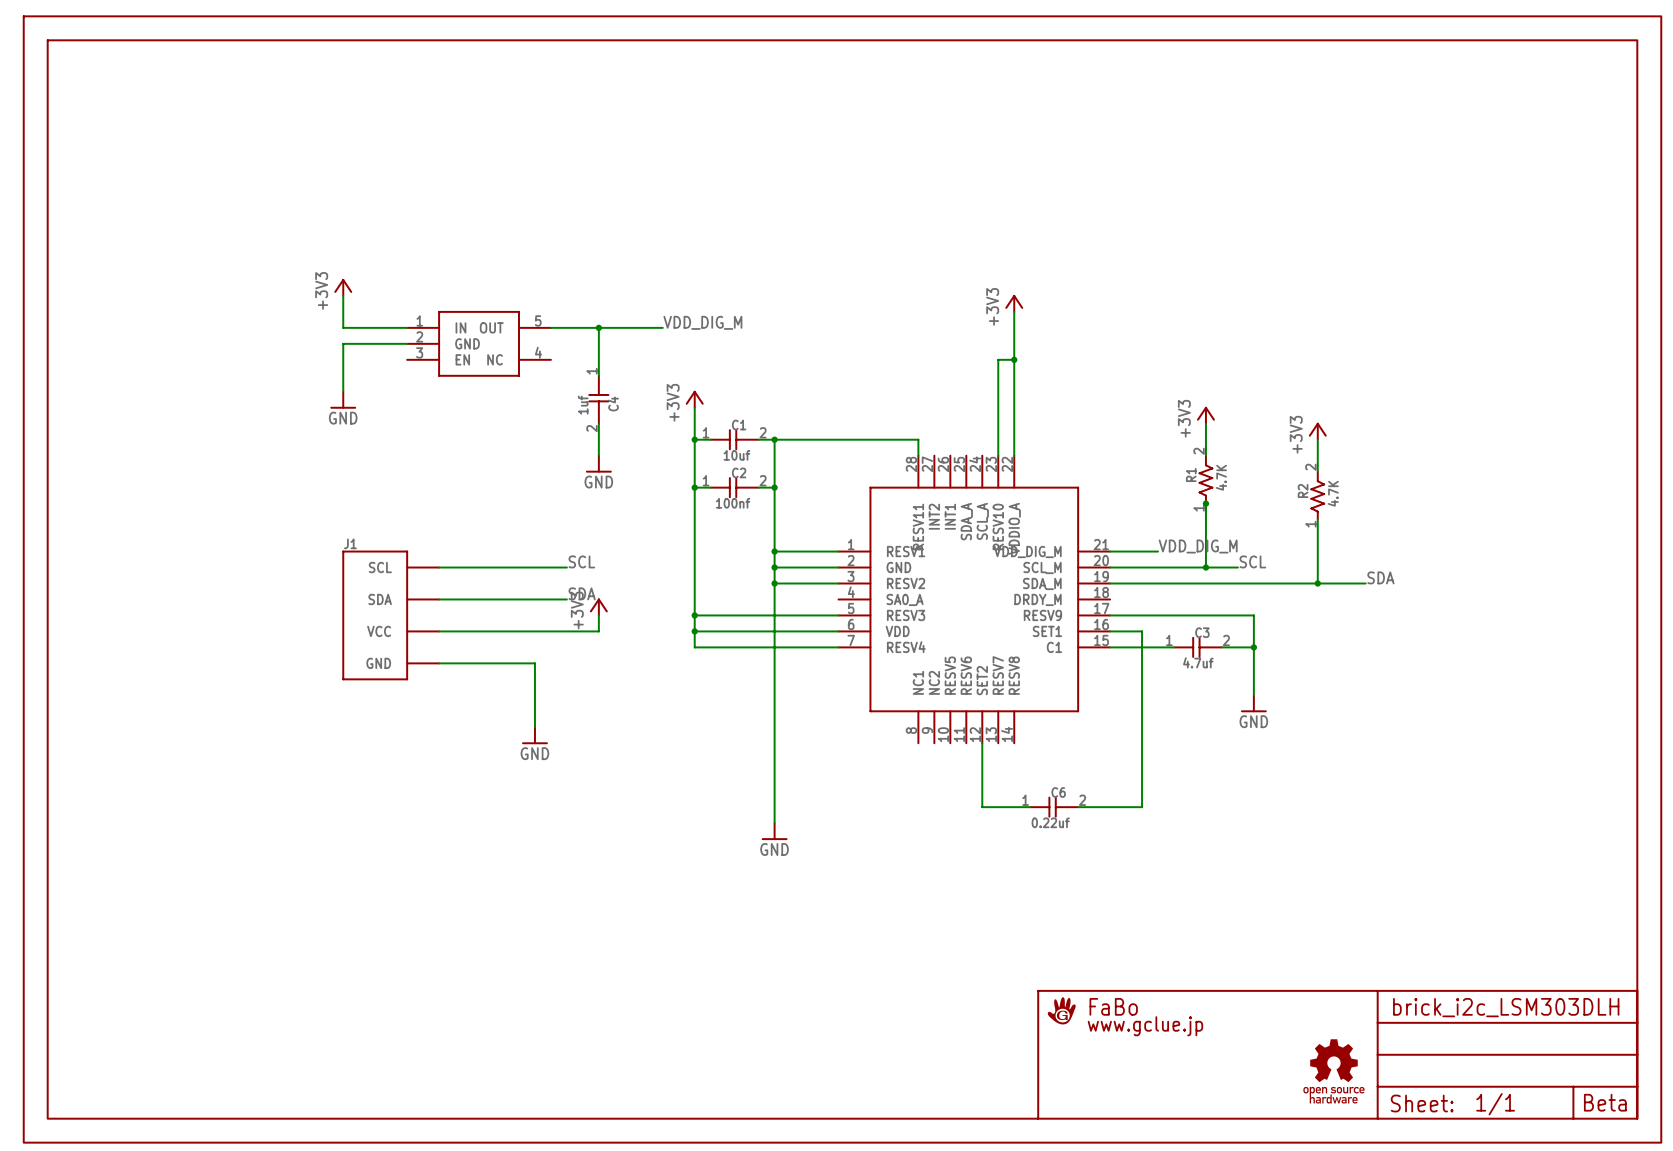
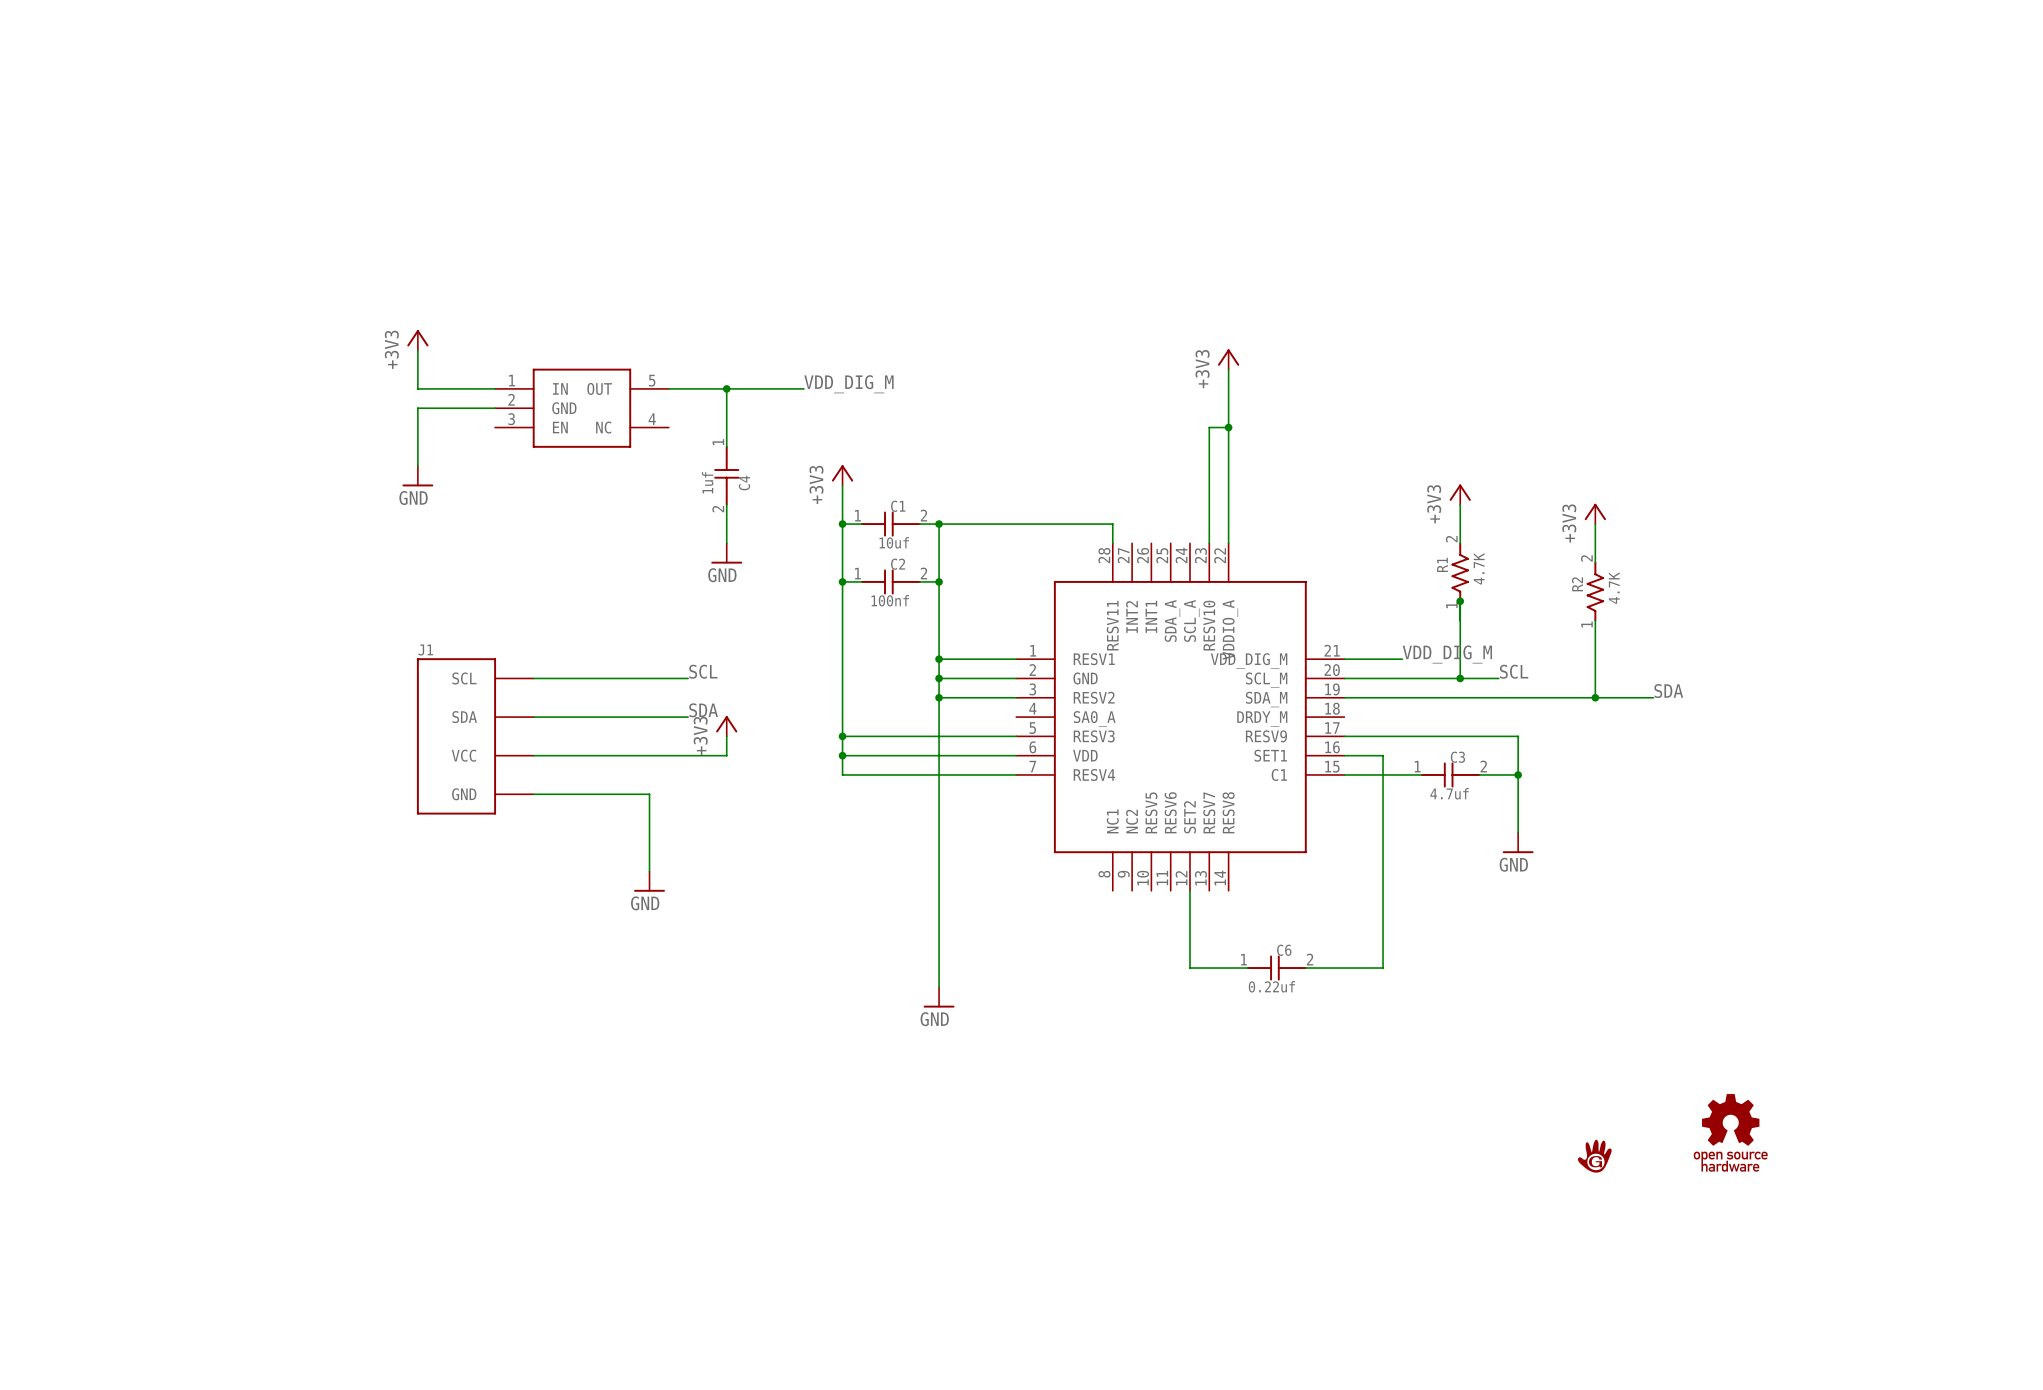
part: (842, 579) -> none
part: none -> (1730, 1132)
part: none -> (1594, 1156)
part: (1333, 1071) -> none
text: Beta (1605, 1102) -> none

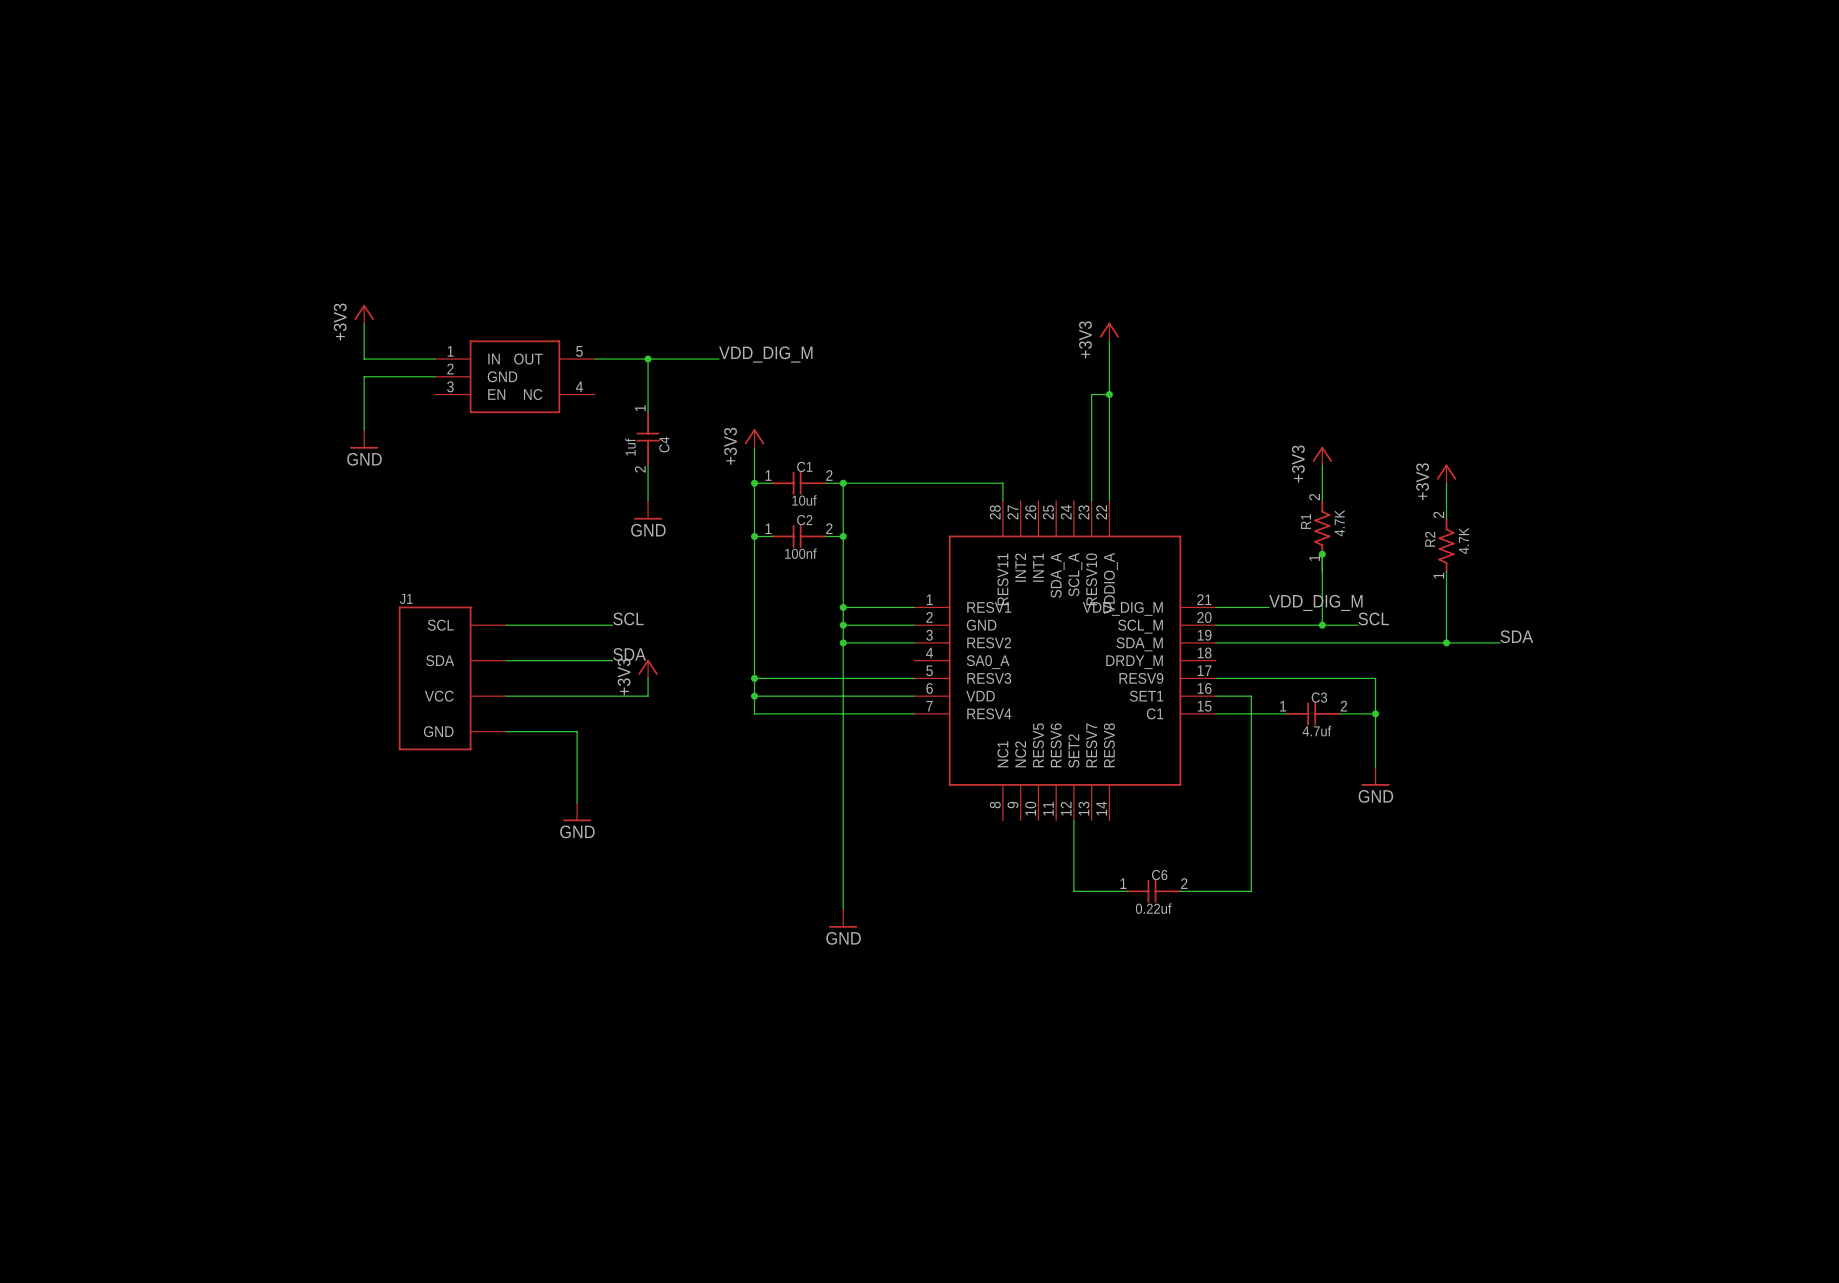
J1 position: (475, 736) -> (452, 678)
part: (1730, 1132) -> none
part: (1594, 1156) -> none

